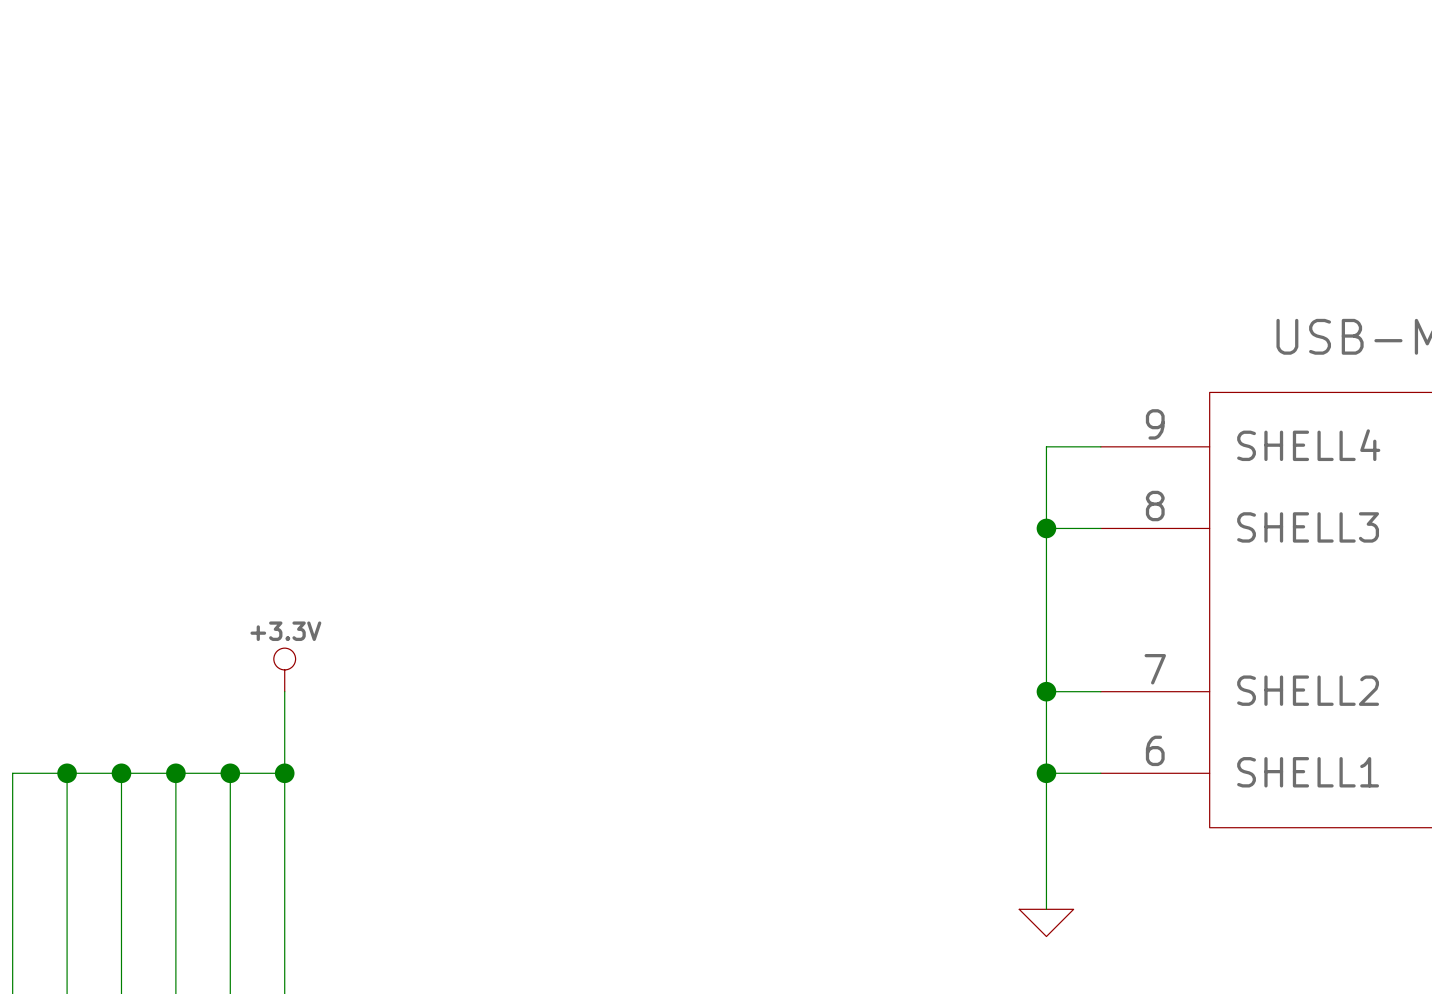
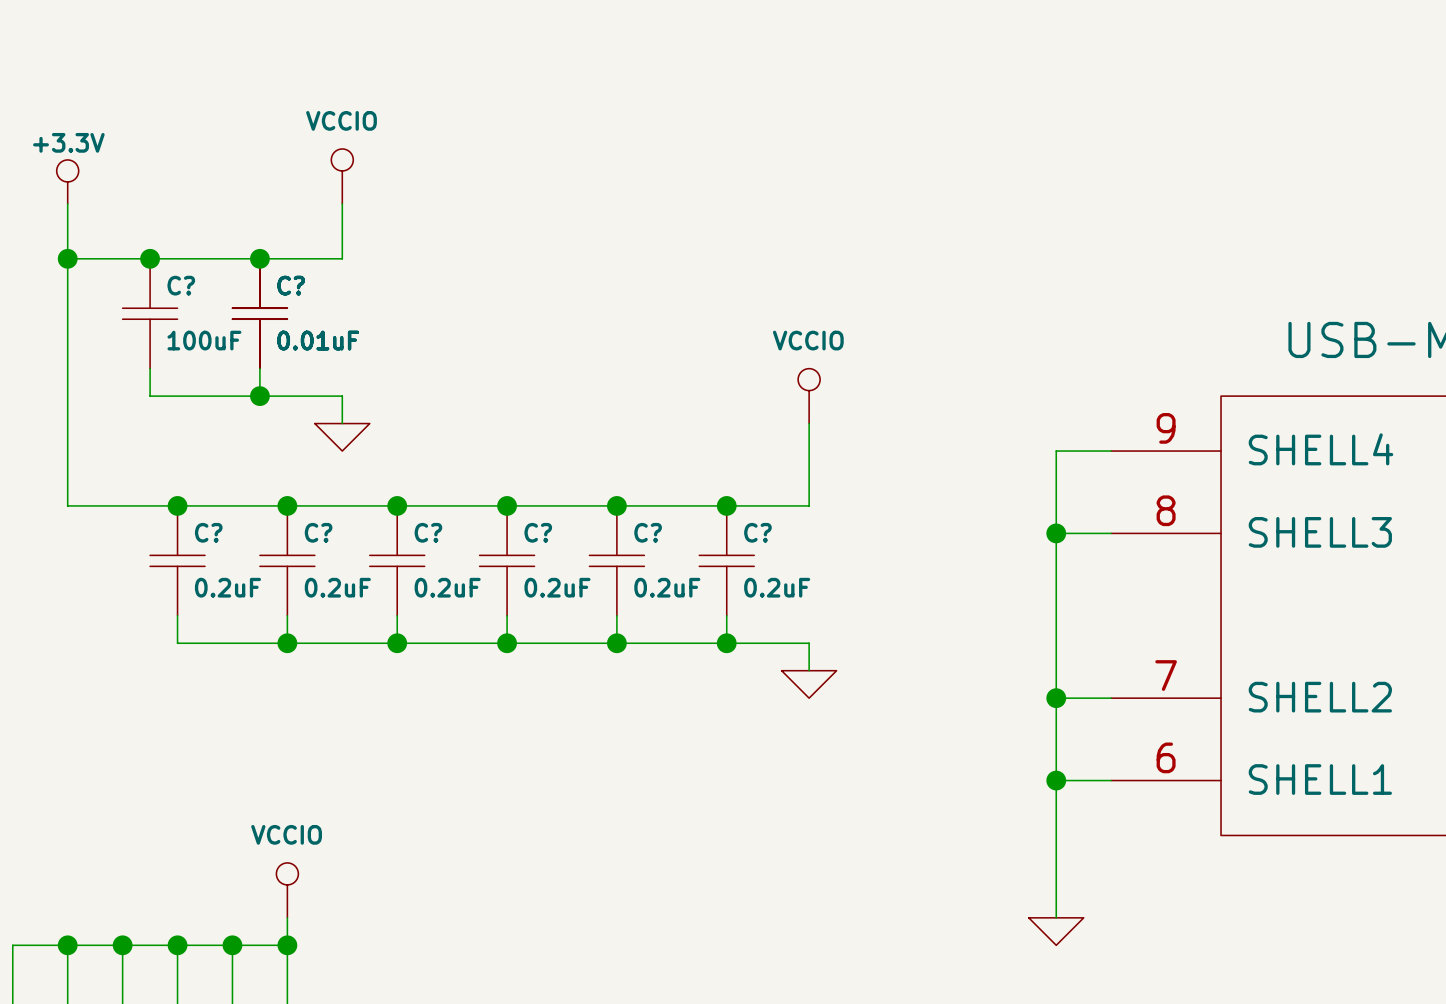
power symbol: none -> VCCIO (342, 176)
power symbol: none -> +3.3V (67, 181)
wire: none -> (67, 203) (67, 505) (809, 505) (809, 423)
wire: none -> (342, 203) (342, 258) (67, 258)
junction: none -> (67, 258)
junction: none -> (150, 258)
junction: none -> (259, 258)
C?: none -> 100uF (150, 313)
C?: none -> 0.01uF (259, 313)
wire: none -> (150, 368) (150, 396) (342, 396) (342, 423)
wire: none -> (259, 368) (259, 396)
junction: none -> (259, 396)
power symbol: none -> VCCIO (809, 396)
power symbol: none -> (342, 437)
junction: none -> (177, 505)
junction: none -> (287, 505)
junction: none -> (397, 505)
junction: none -> (507, 505)
junction: none -> (616, 505)
junction: none -> (726, 505)
C?: none -> 0.2uF (177, 560)
C?: none -> 0.2uF (287, 560)
C?: none -> 0.2uF (397, 560)
C?: none -> 0.2uF (507, 560)
C?: none -> 0.2uF (616, 560)
C?: none -> 0.2uF (726, 560)
wire: none -> (177, 615) (177, 643) (809, 643) (809, 670)
wire: none -> (287, 615) (287, 643)
wire: none -> (397, 615) (397, 643)
wire: none -> (507, 615) (507, 643)
wire: none -> (616, 615) (616, 643)
wire: none -> (726, 615) (726, 643)
junction: none -> (287, 643)
junction: none -> (397, 643)
junction: none -> (507, 643)
junction: none -> (616, 643)
junction: none -> (726, 643)
power symbol: +3.3V (284, 669) -> none
power symbol: none -> (809, 684)
wire: (284, 691) (284, 909) -> none
wire: (67, 773) (67, 936) -> none
junction: (67, 773) -> none
wire: (121, 773) (121, 936) -> none
junction: (121, 773) -> none
wire: (175, 773) (175, 936) -> none
junction: (175, 773) -> none
wire: (230, 773) (230, 936) -> none
junction: (230, 773) -> none
wire: (284, 773) (12, 773) (12, 936) -> (287, 945) (12, 945)
junction: (284, 773) -> none
power symbol: none -> VCCIO (287, 890)
junction: none -> (67, 945)
junction: none -> (122, 945)
junction: none -> (177, 945)
junction: none -> (232, 945)
junction: none -> (287, 945)

